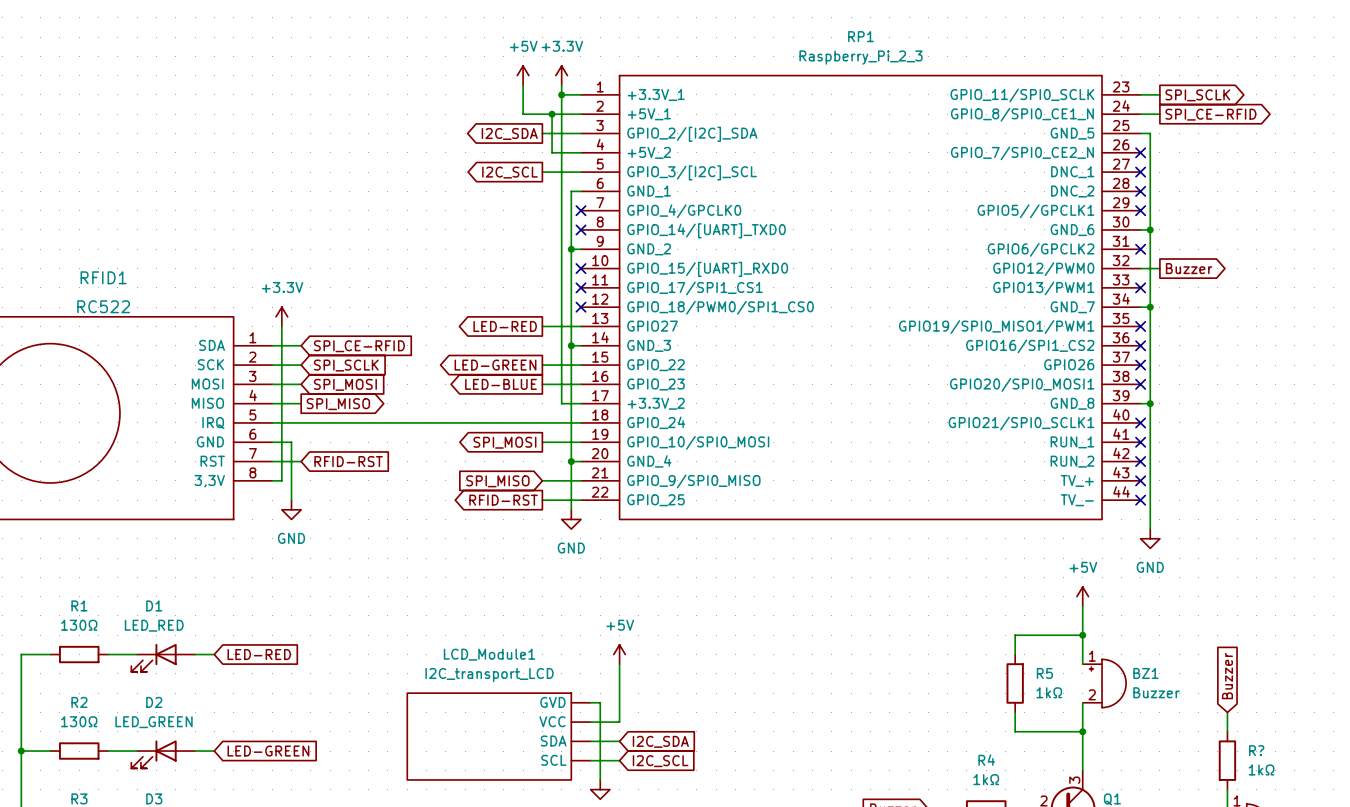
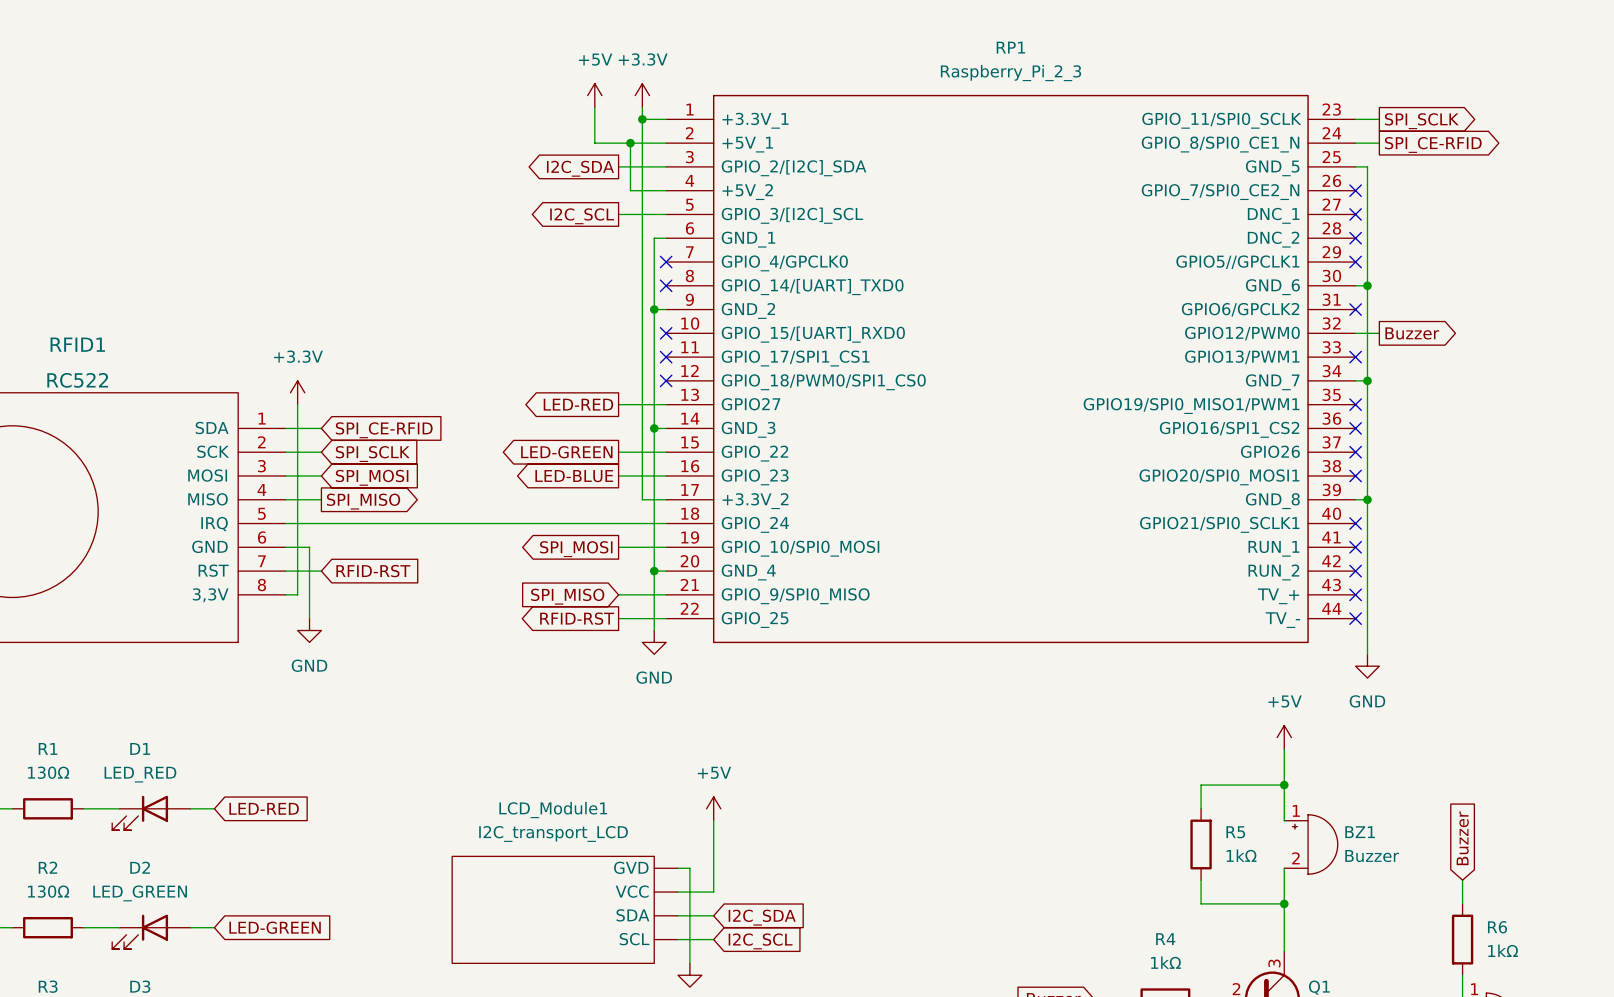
R? name: R? (1256, 750) -> R6 (1497, 927)

